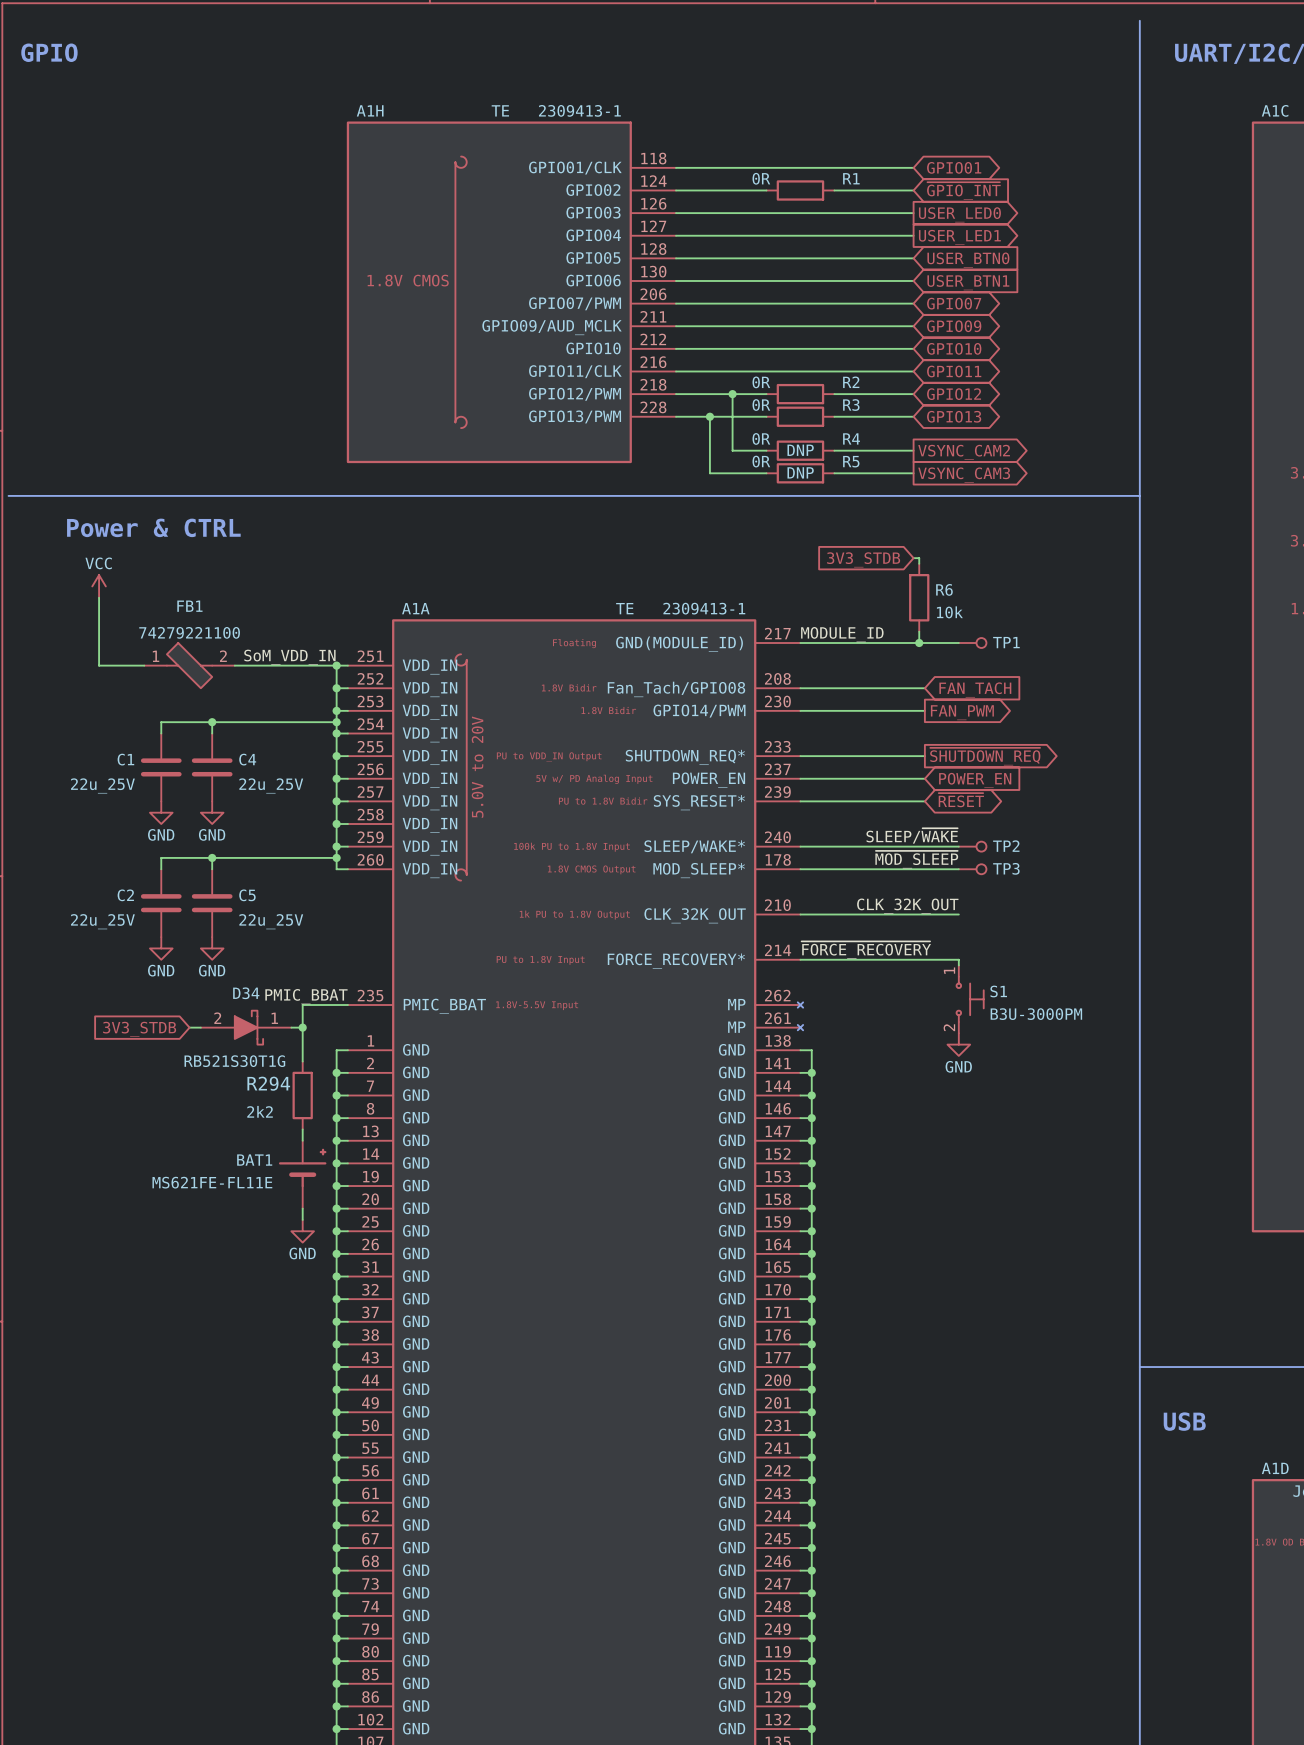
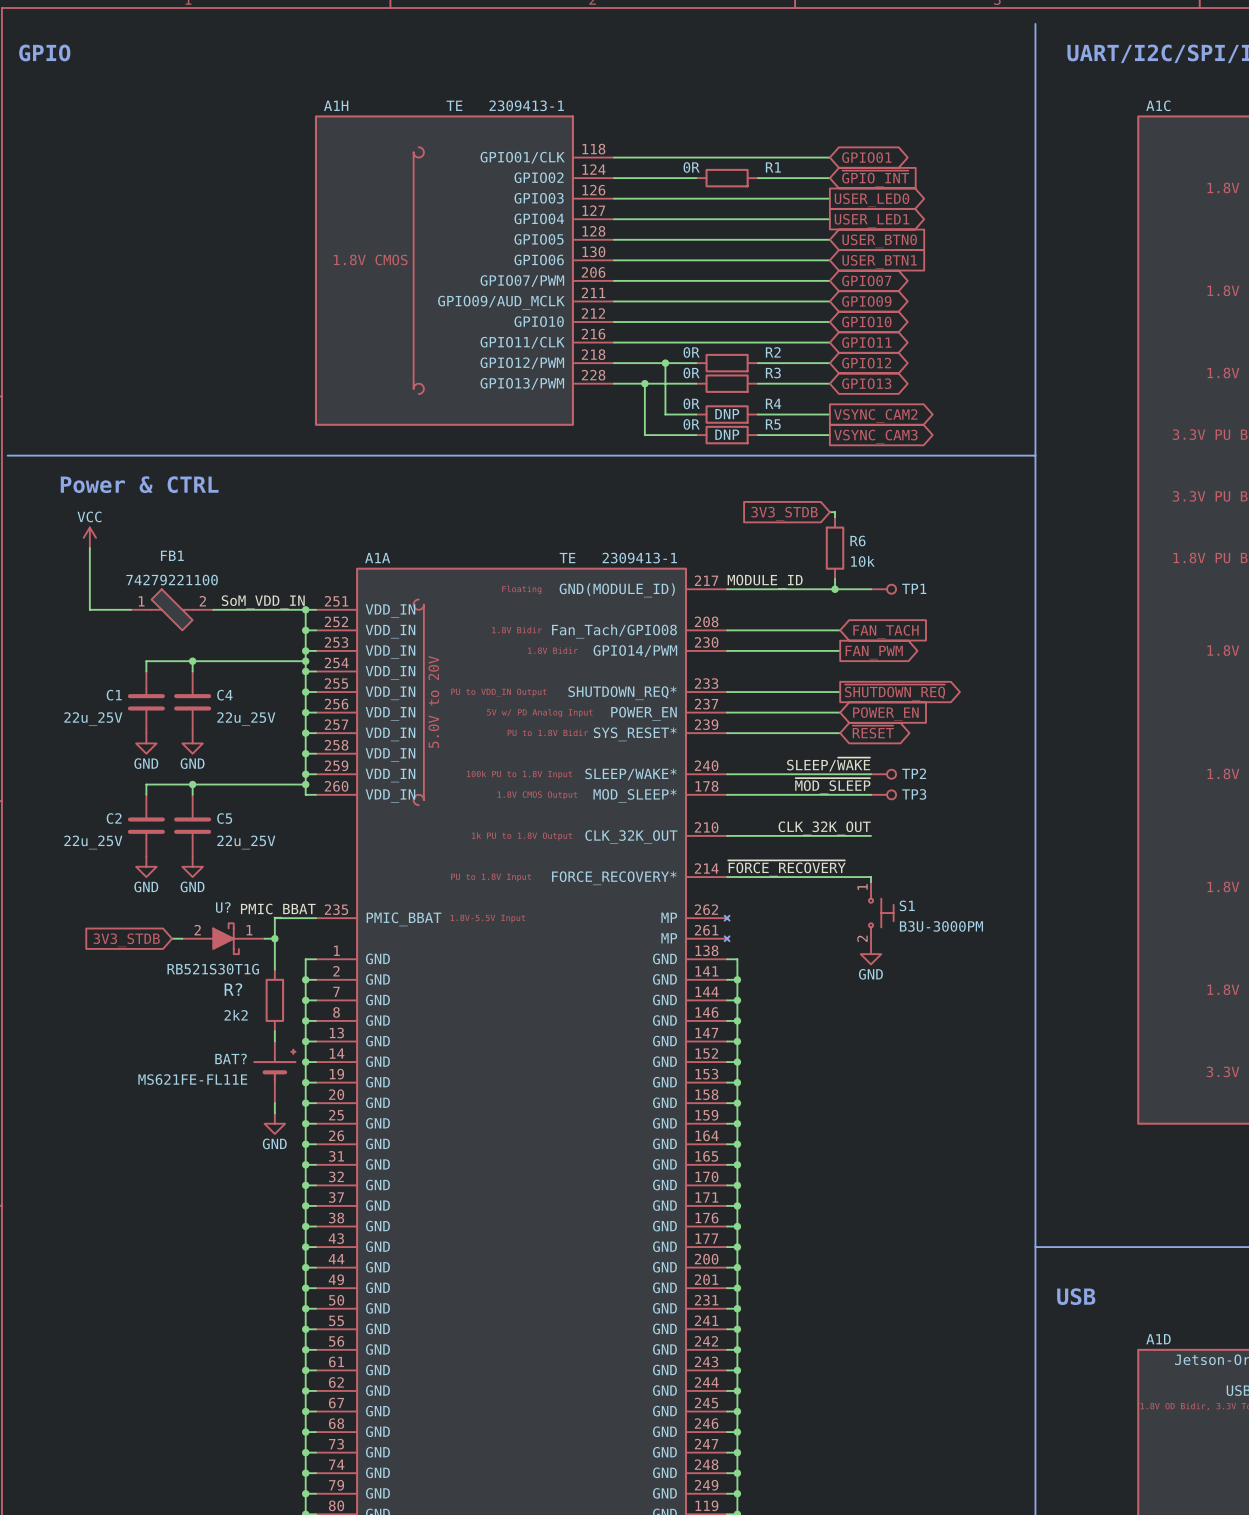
D34 name: D34 (246, 993) -> U? (223, 907)
R294 name: R294 (268, 1083) -> R? (233, 989)
BAT1 name: BAT1 (254, 1160) -> BAT? (231, 1058)

